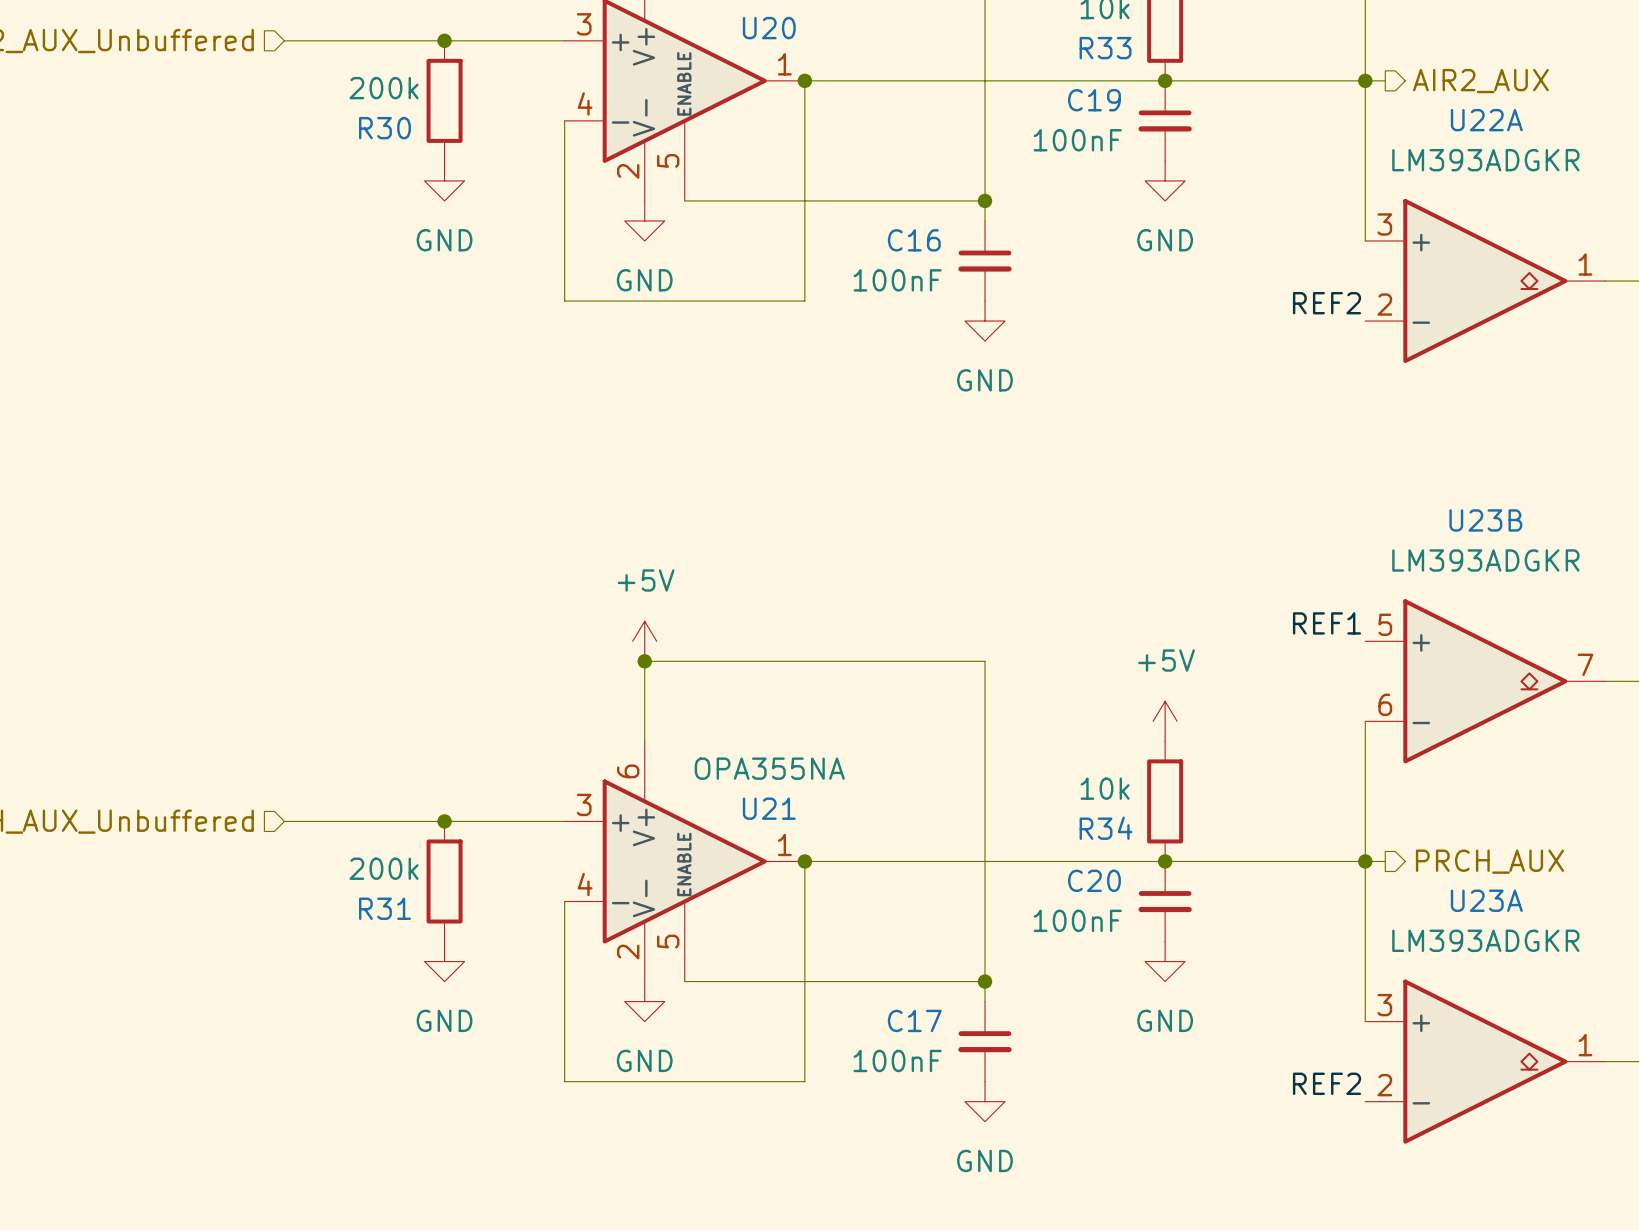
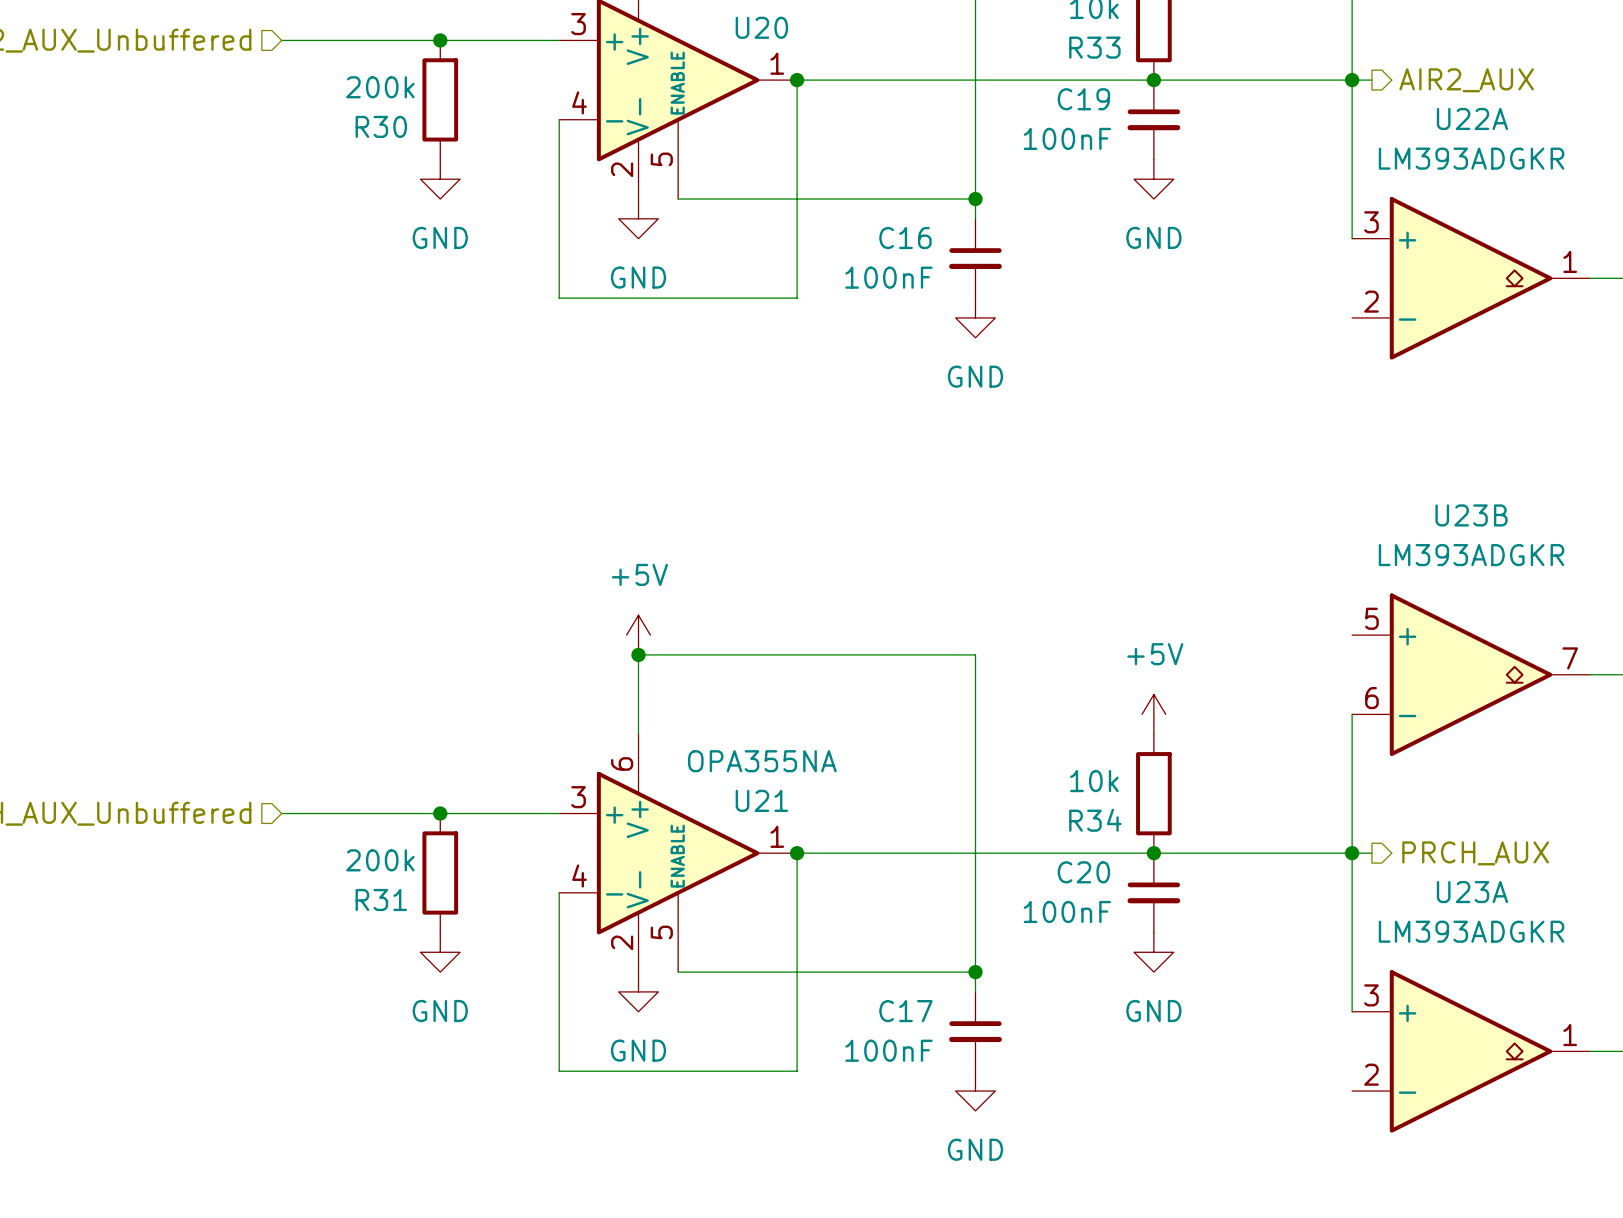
label: REF2 (1327, 303) -> none
label: REF1 (1327, 623) -> none
label: REF2 (1327, 1083) -> none

